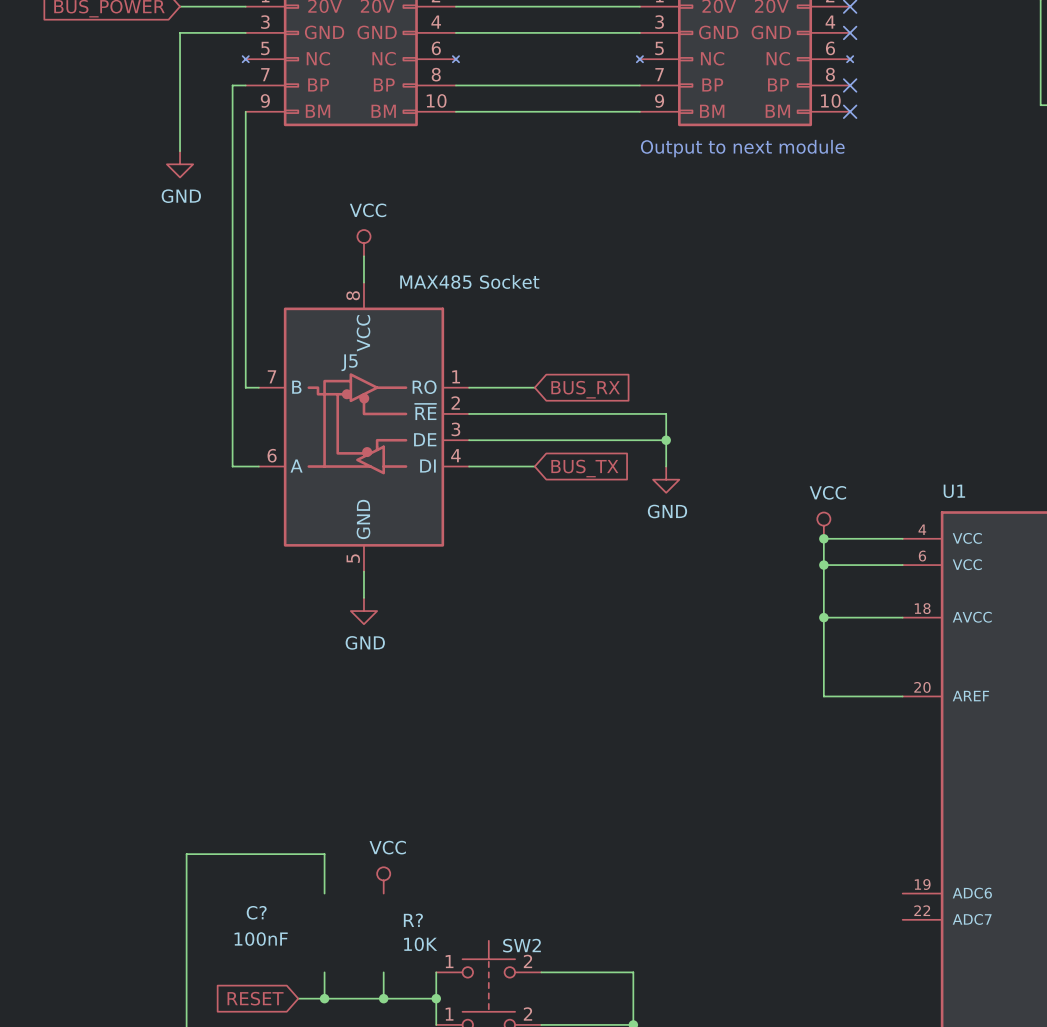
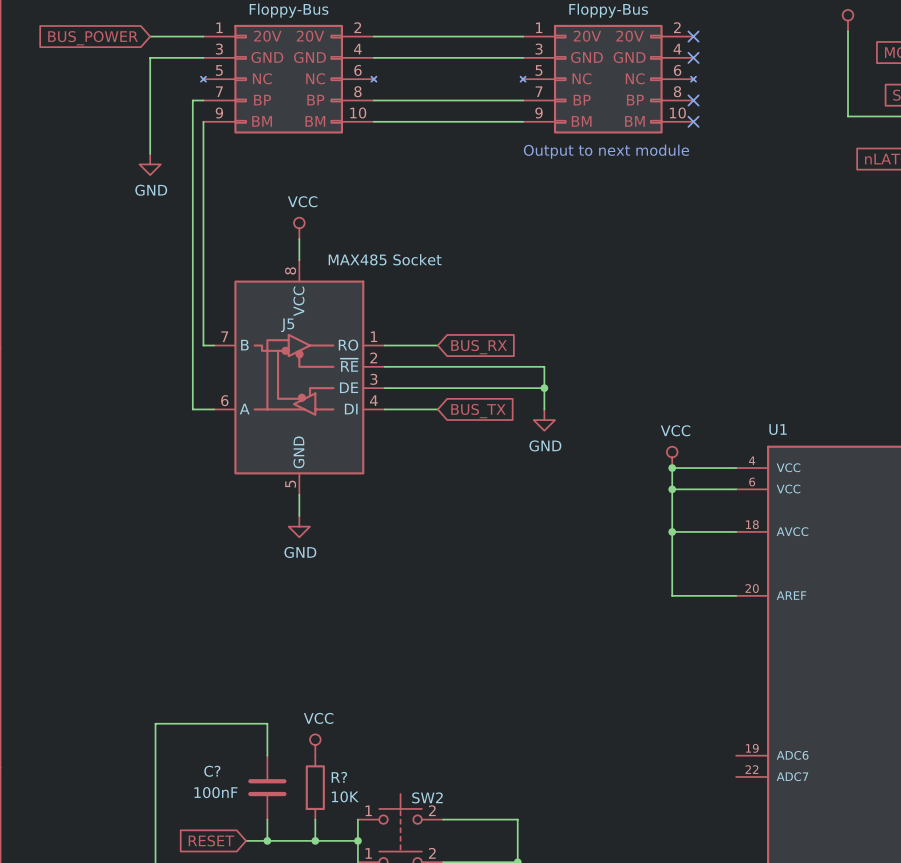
C?: none -> 100nF (267, 787)
R?: none -> 10K (315, 787)

